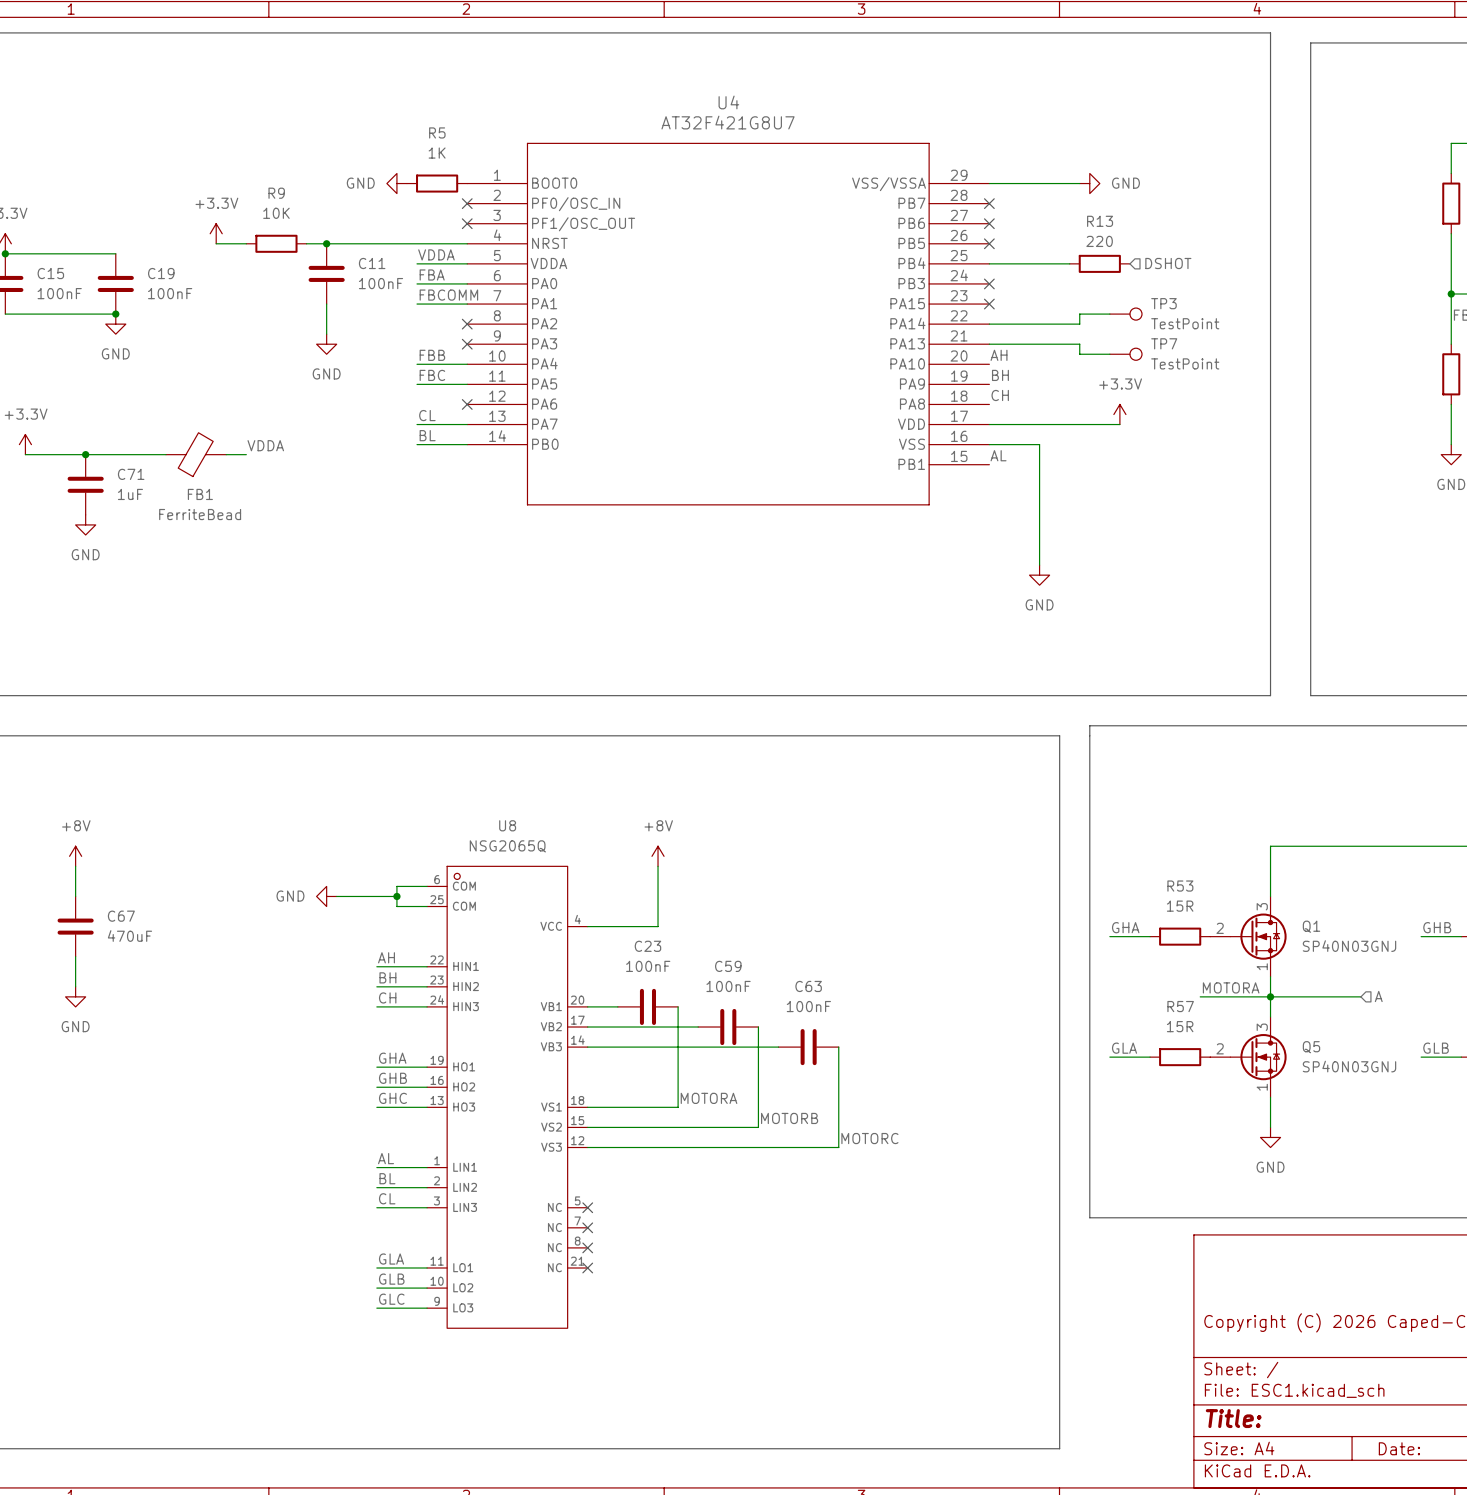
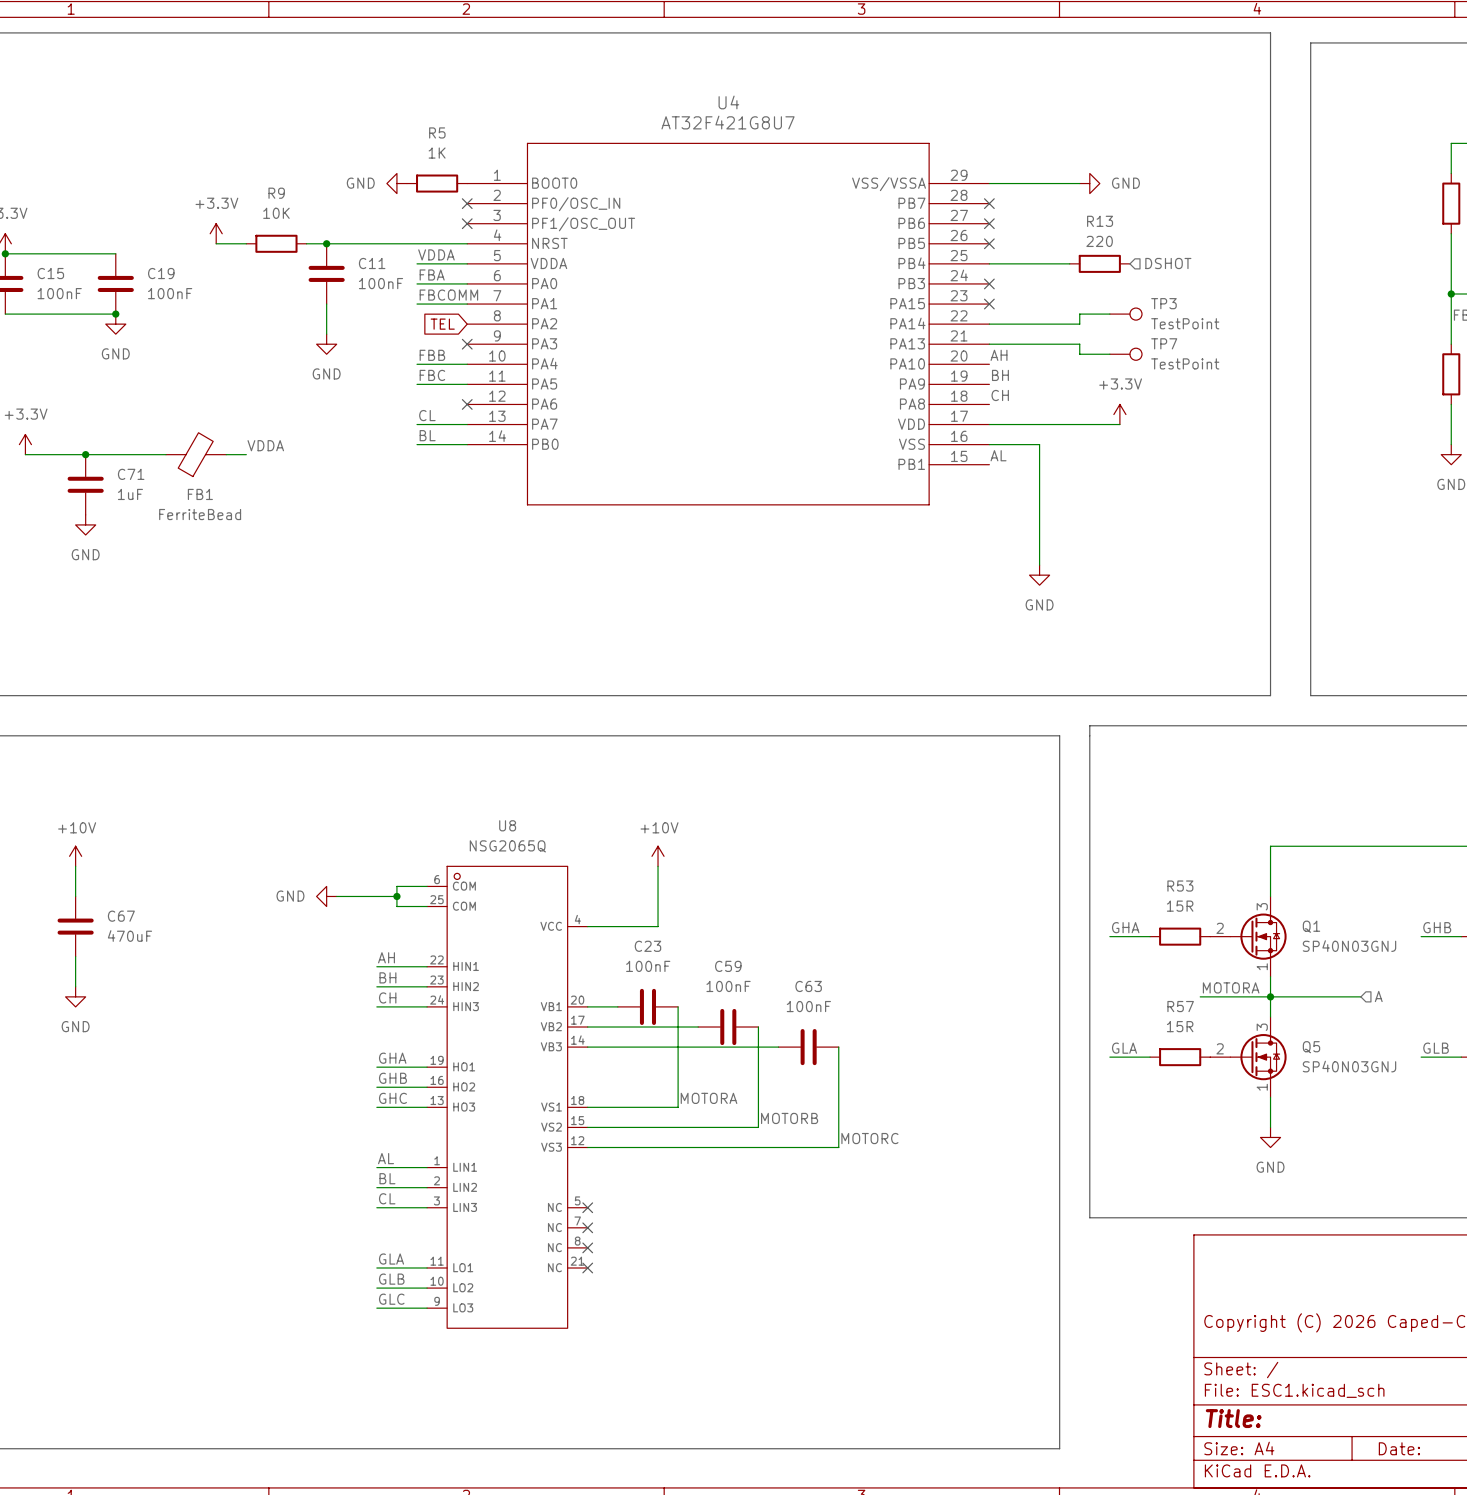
global label: none -> TEL (442, 324)
no-connect mark: (467, 324) -> none
power symbol: +8V (75, 856) -> +10V (75, 856)
power symbol: +8V (658, 856) -> +10V (658, 856)

